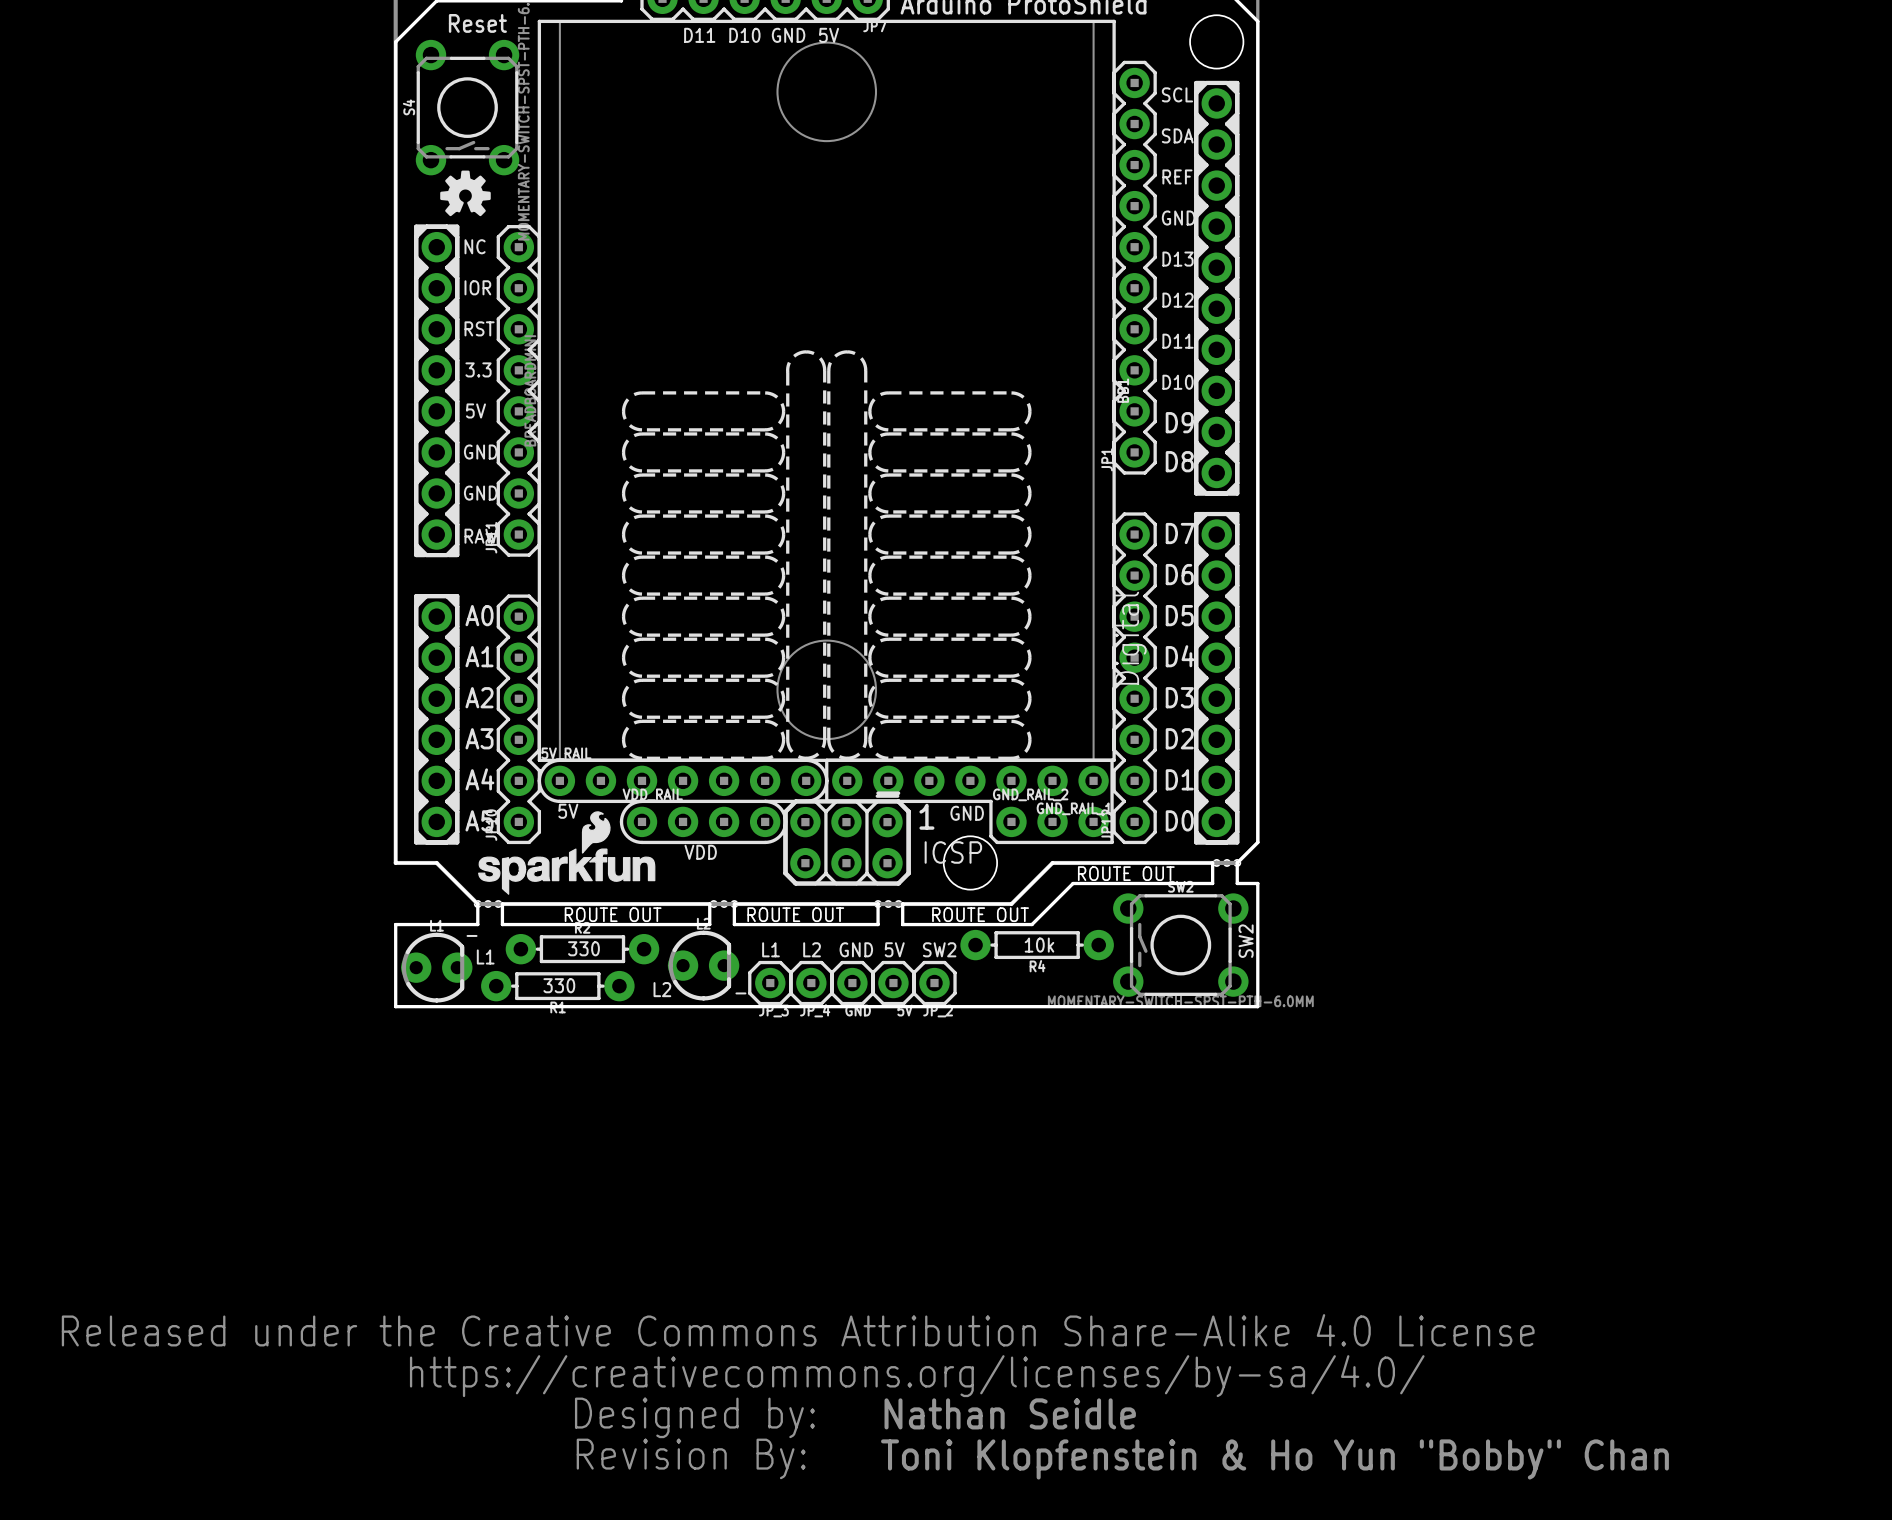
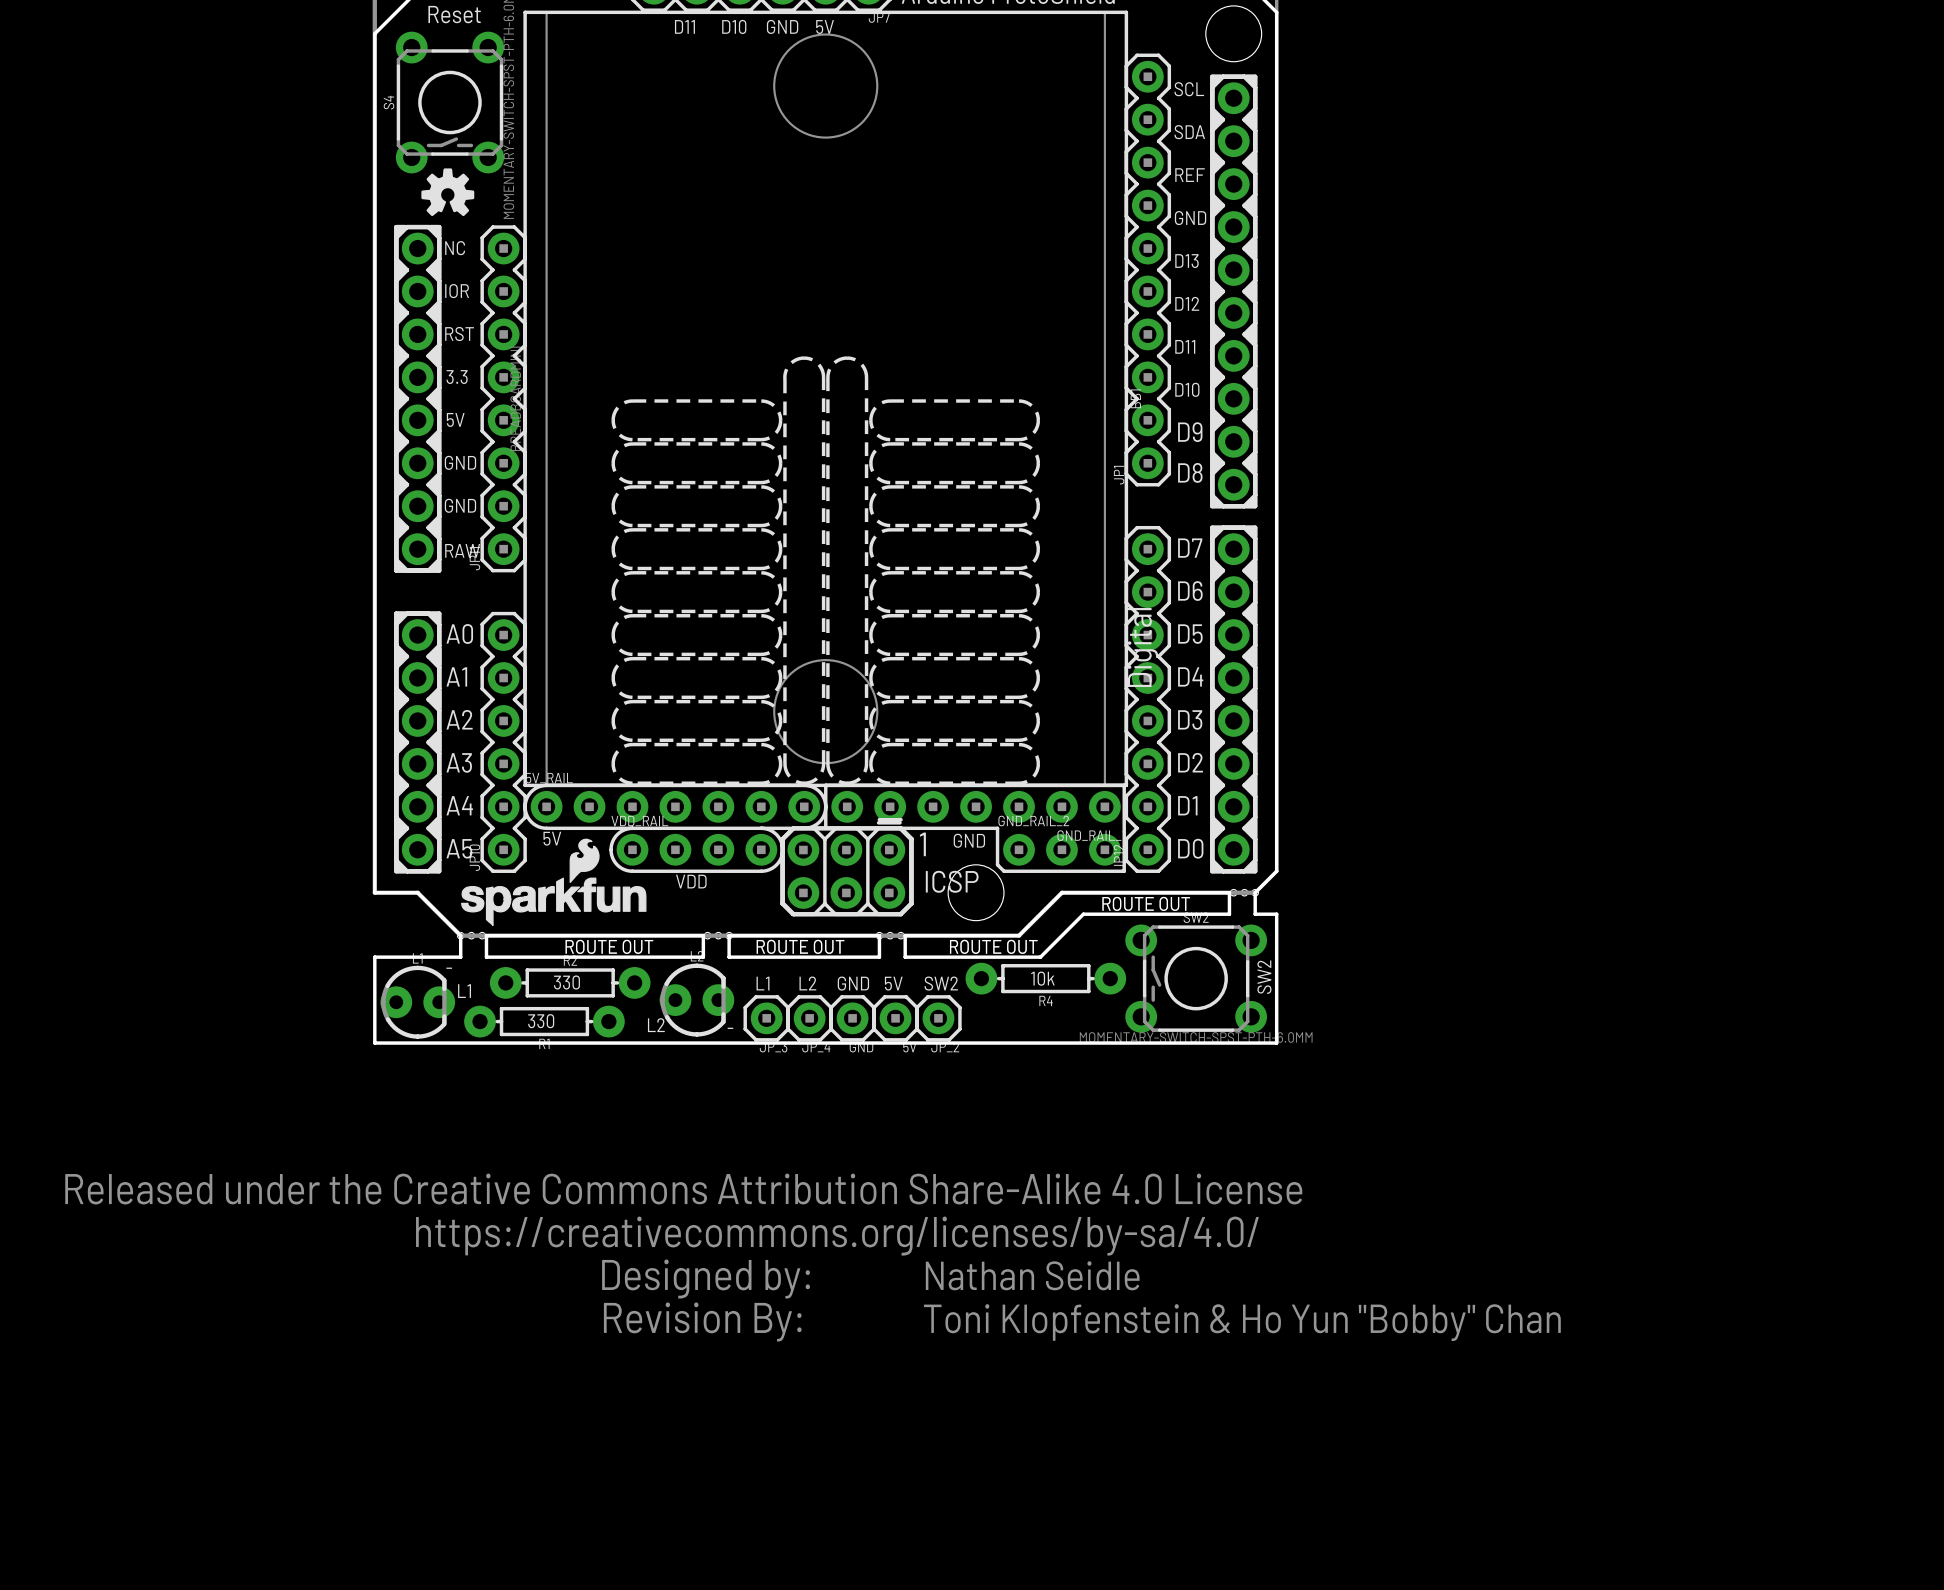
drawing position: (798, 1376) -> (683, 1236)
text position: Nathan Seidle (1010, 1413) -> Nathan Seidle (1032, 1275)
drawing position: (691, 1458) -> (702, 1321)
text position: Toni Klopfenstein & Ho Yun "Bobby" Chan (1274, 1459) -> Toni Klopfenstein & Ho Yun "Bobby" Chan (1242, 1322)

